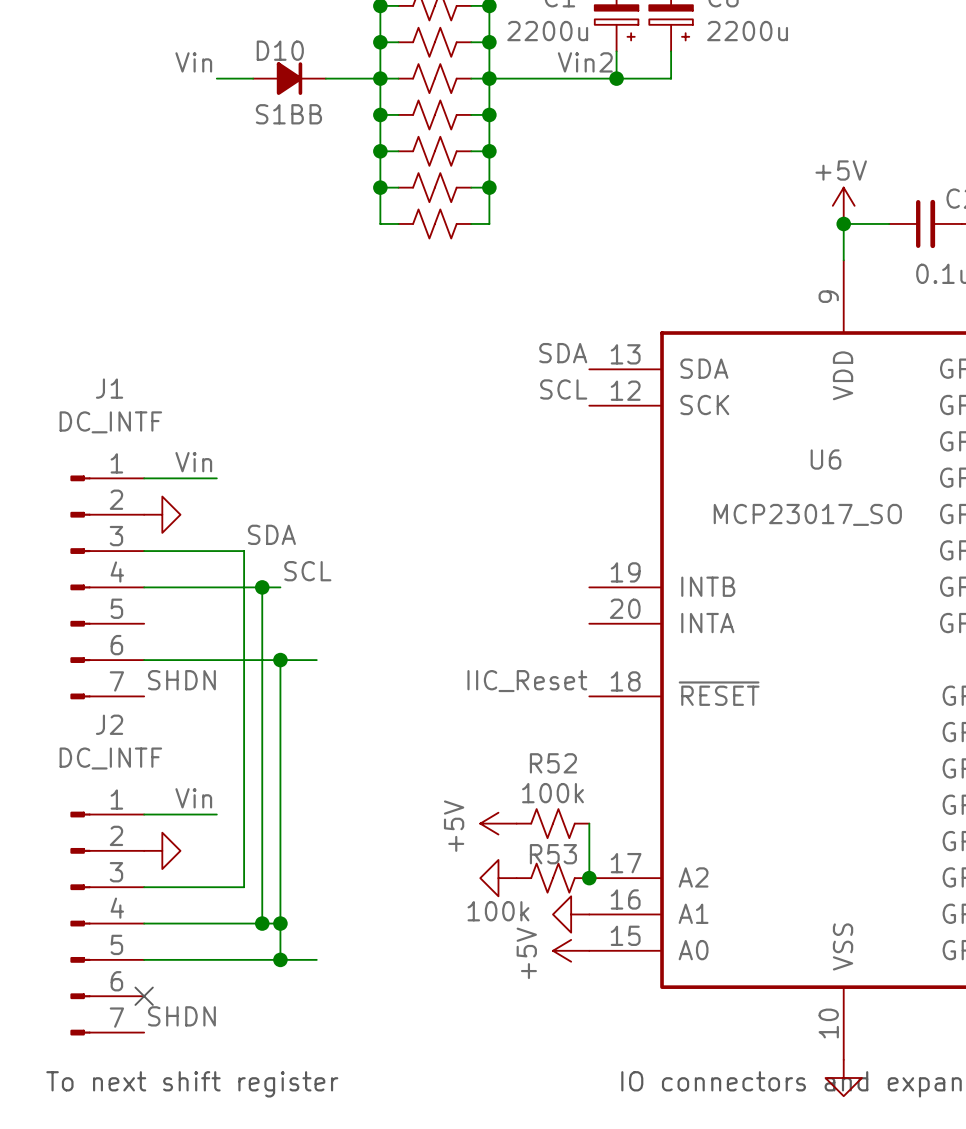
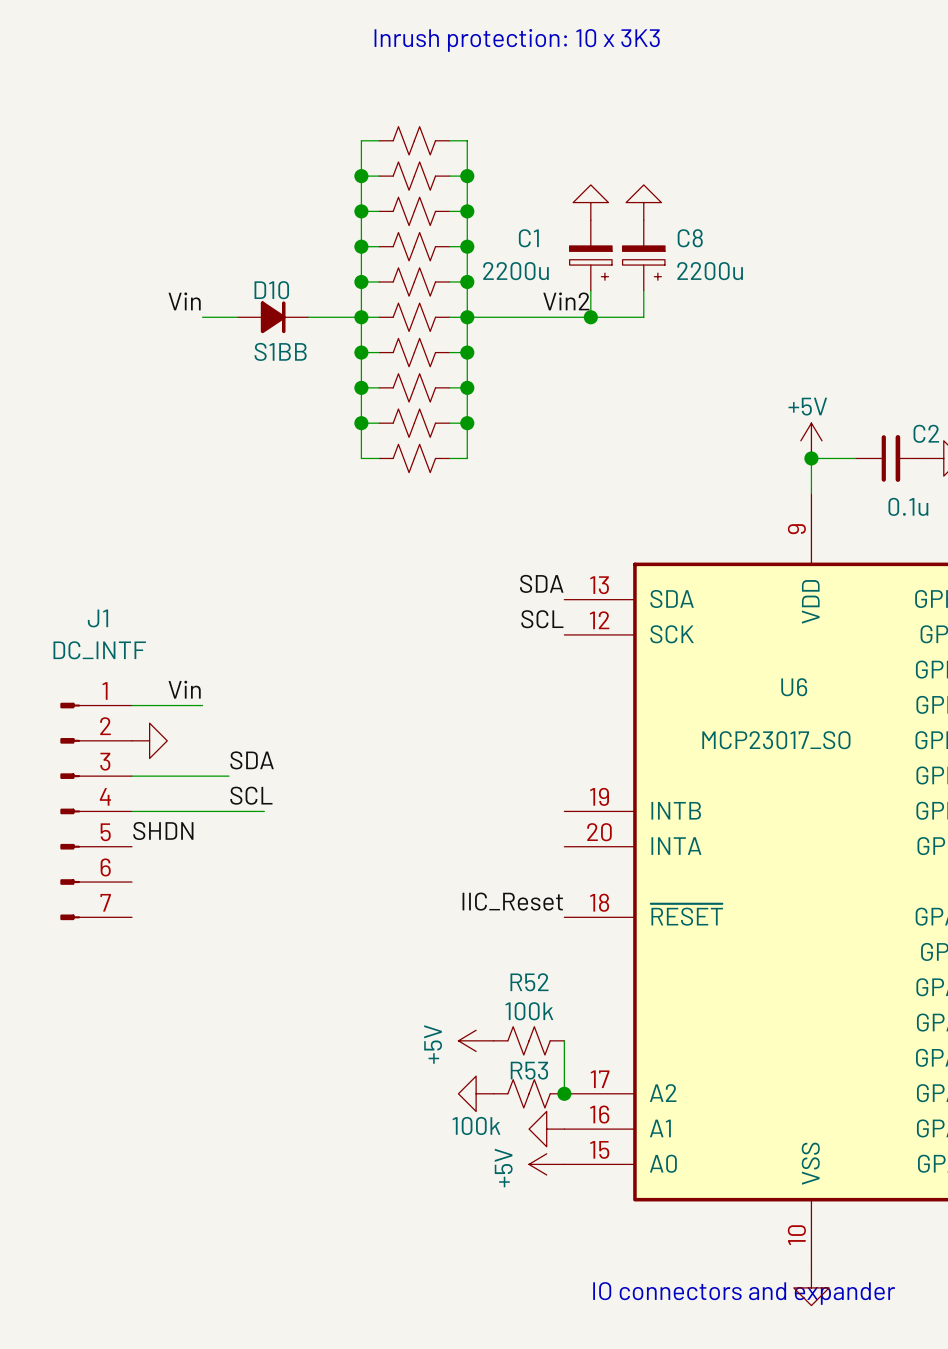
wire: (244, 551) (244, 887) (144, 887) -> none
label position: SCL (307, 571) -> SCL (251, 795)
wire: (262, 587) (262, 923) -> none
junction: (262, 587) -> none
wire: (144, 660) (316, 660) -> none
wire: (280, 660) (280, 959) -> none
junction: (280, 660) -> none
label position: SHDN (181, 680) -> SHDN (163, 830)
label: Vin (193, 798) -> none
wire: (144, 814) (216, 814) -> none
power symbol: (162, 850) -> none
J2: DC_INTF (107, 923) -> none
wire: (144, 923) (280, 923) -> none
junction: (262, 923) -> none
junction: (280, 923) -> none
wire: (144, 959) (316, 959) -> none
junction: (280, 959) -> none
no-connect mark: (144, 996) -> none
label: SHDN (181, 1016) -> none
text: To next shift register (192, 1084) -> none

